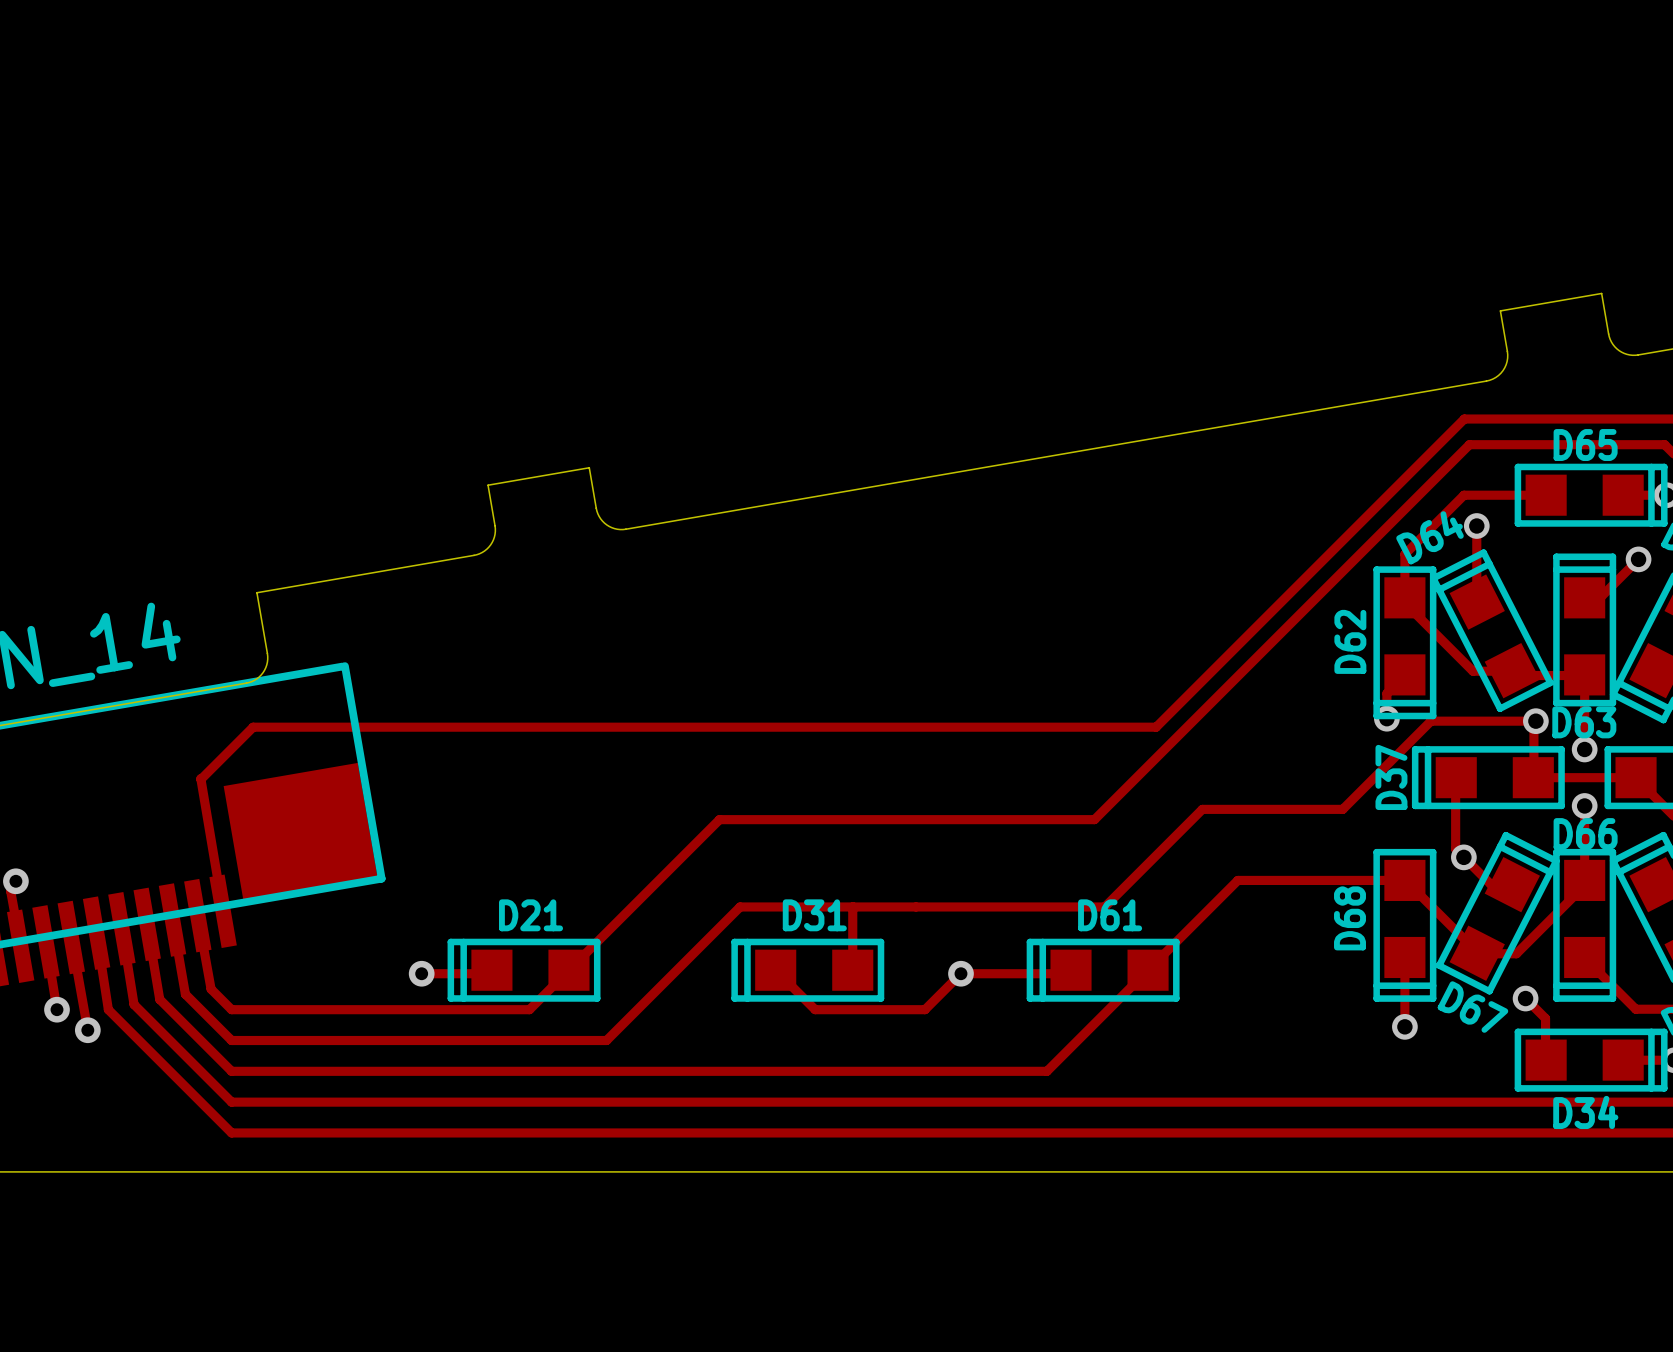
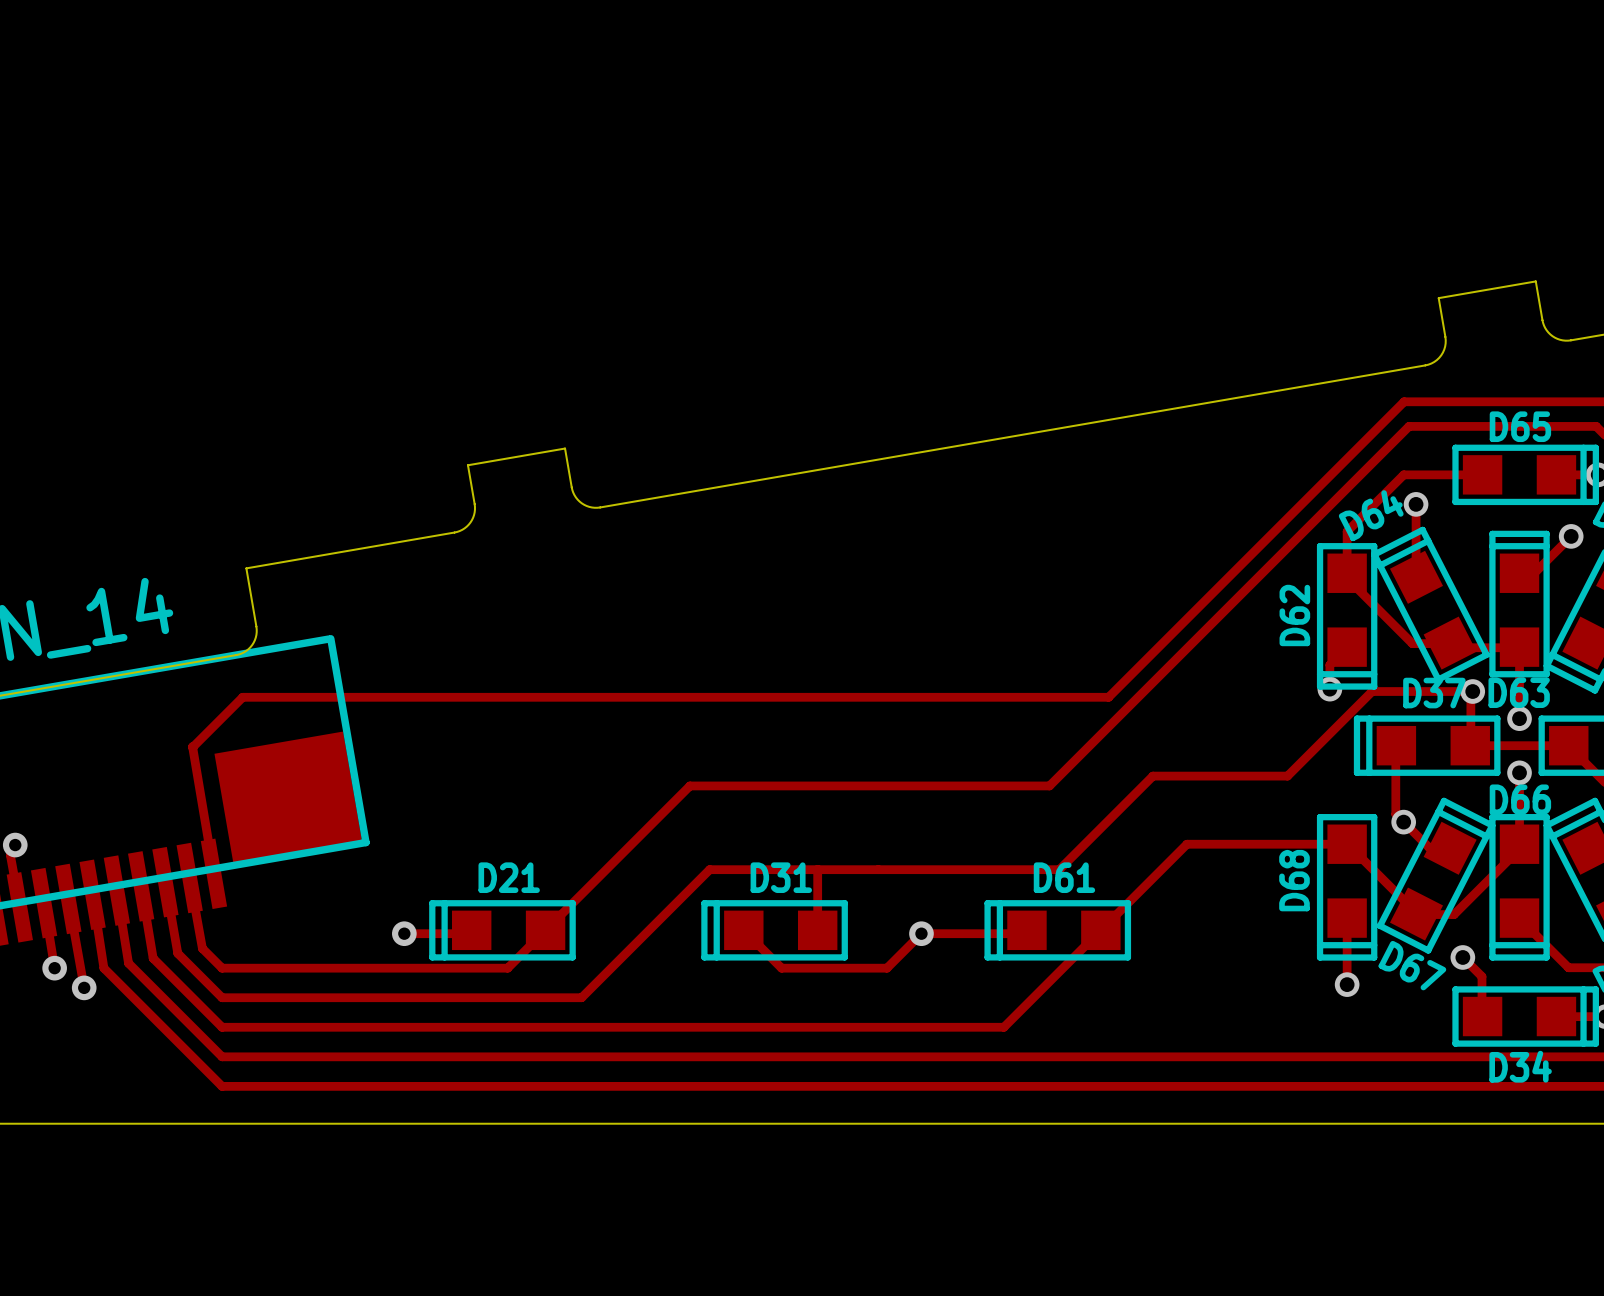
D37 name rotation: 0° (1391, 777) -> 90° clockwise (1434, 693)
D37 name position: D37 (1391, 777) -> D37 (1434, 693)

